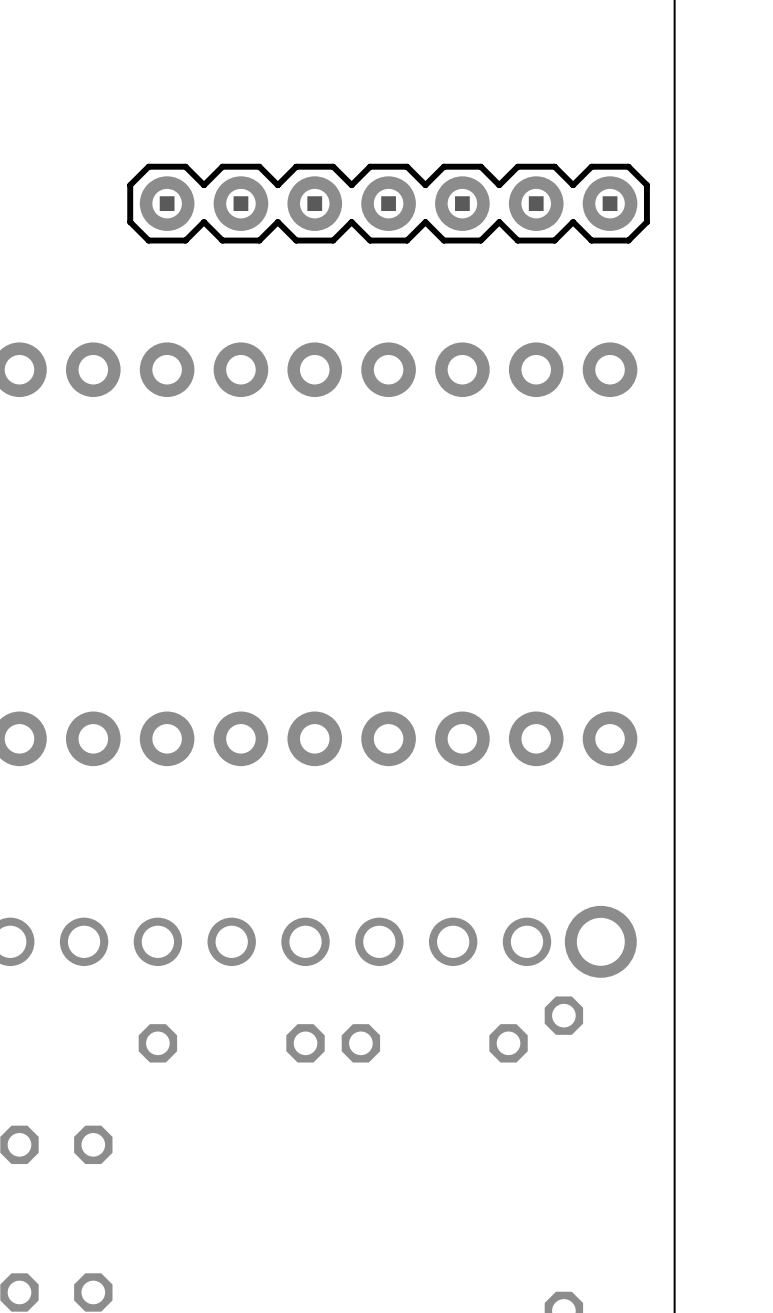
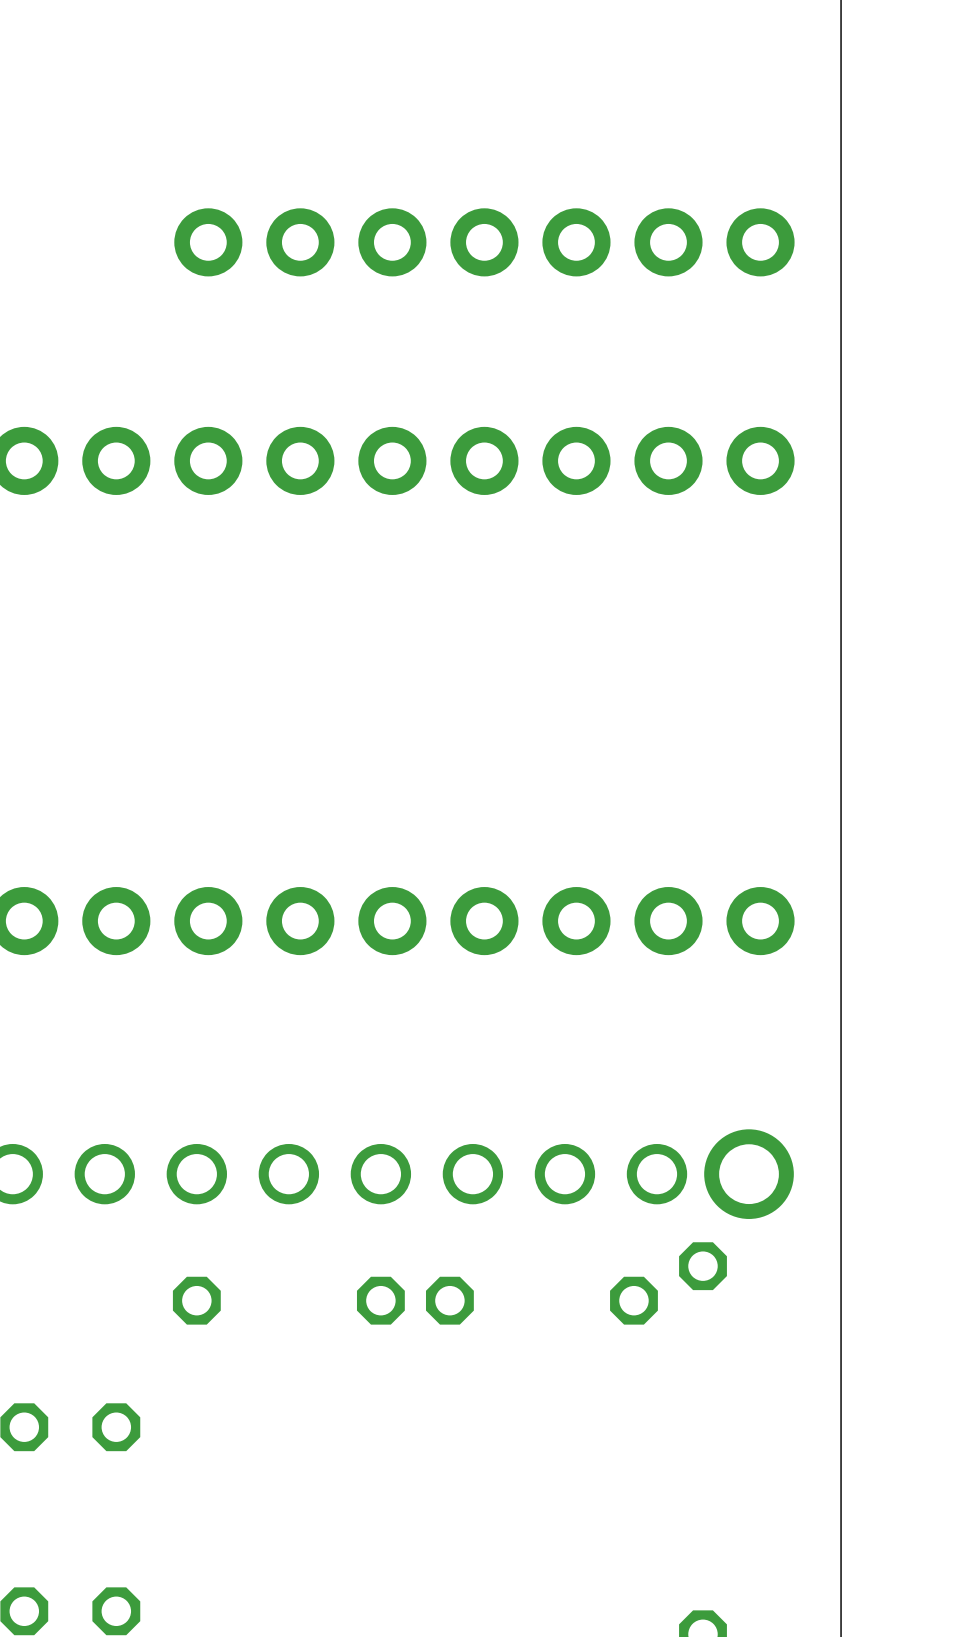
part side: bottom (388, 203) -> top (484, 242)

